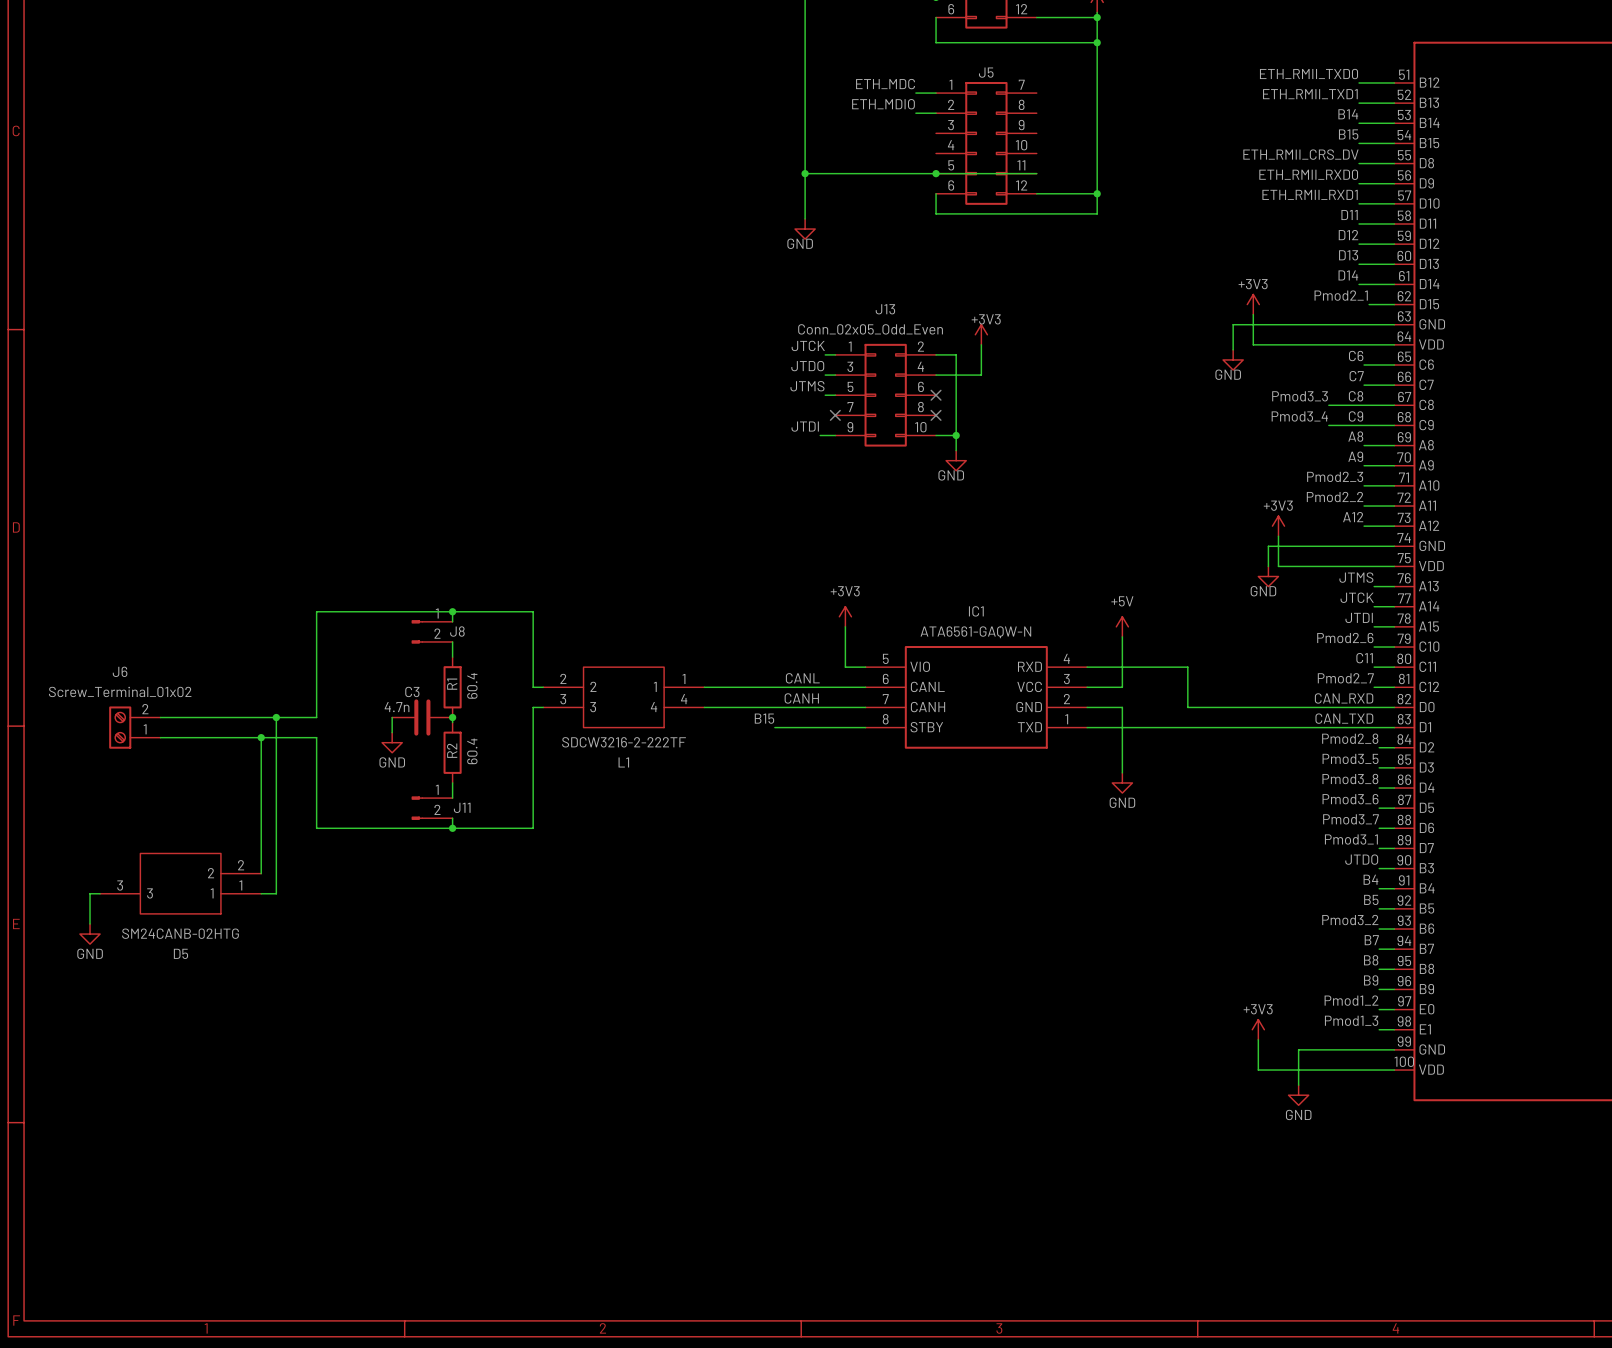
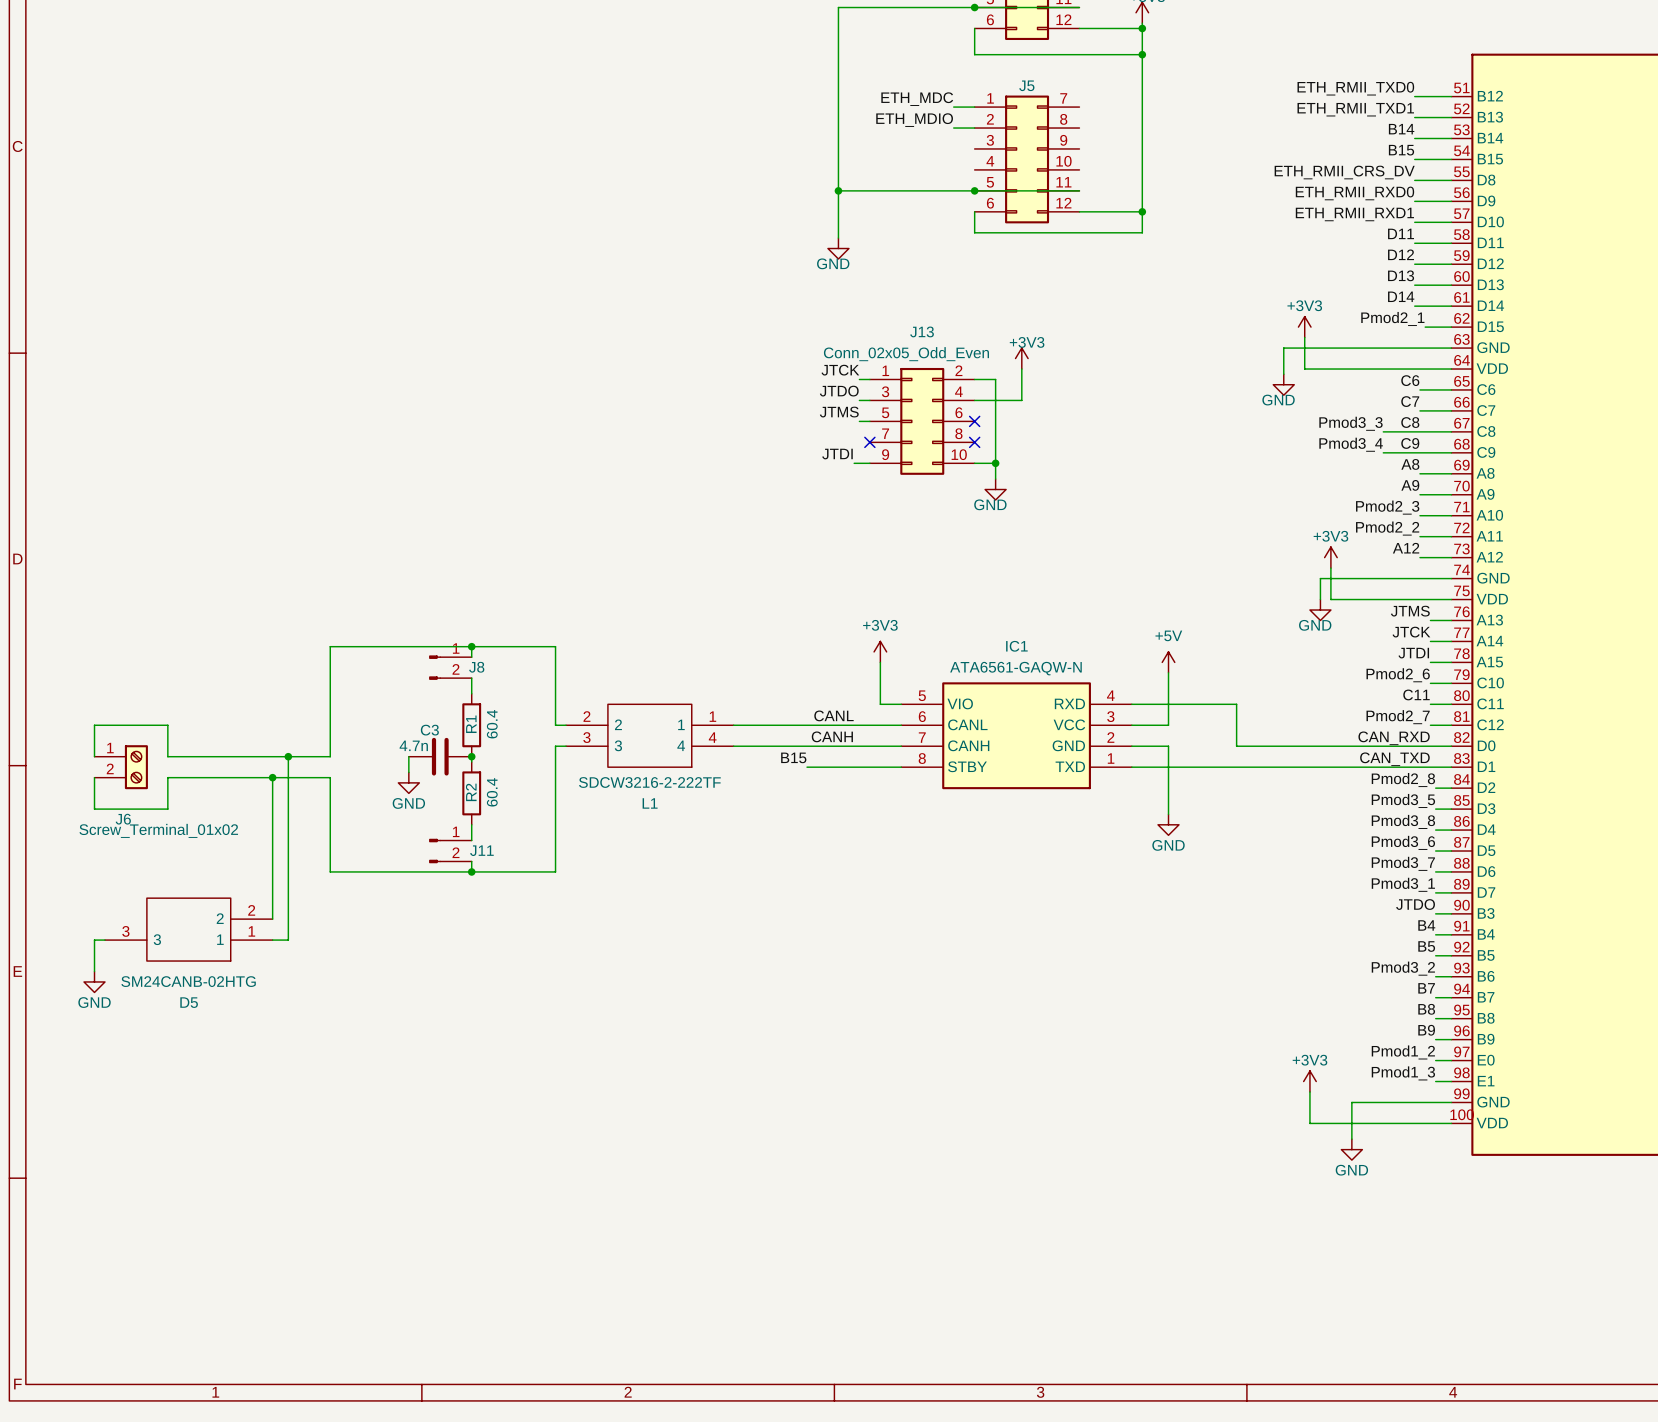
J6 value position: Screw_Terminal_01x02 (120, 691) -> Screw_Terminal_01x02 (158, 830)
wire: none -> (94, 756) (94, 725) (167, 725) (167, 756)
J6 rotation: 0° (120, 727) -> 180° (136, 767)
wire: none -> (94, 777) (94, 809) (167, 809) (167, 777)

